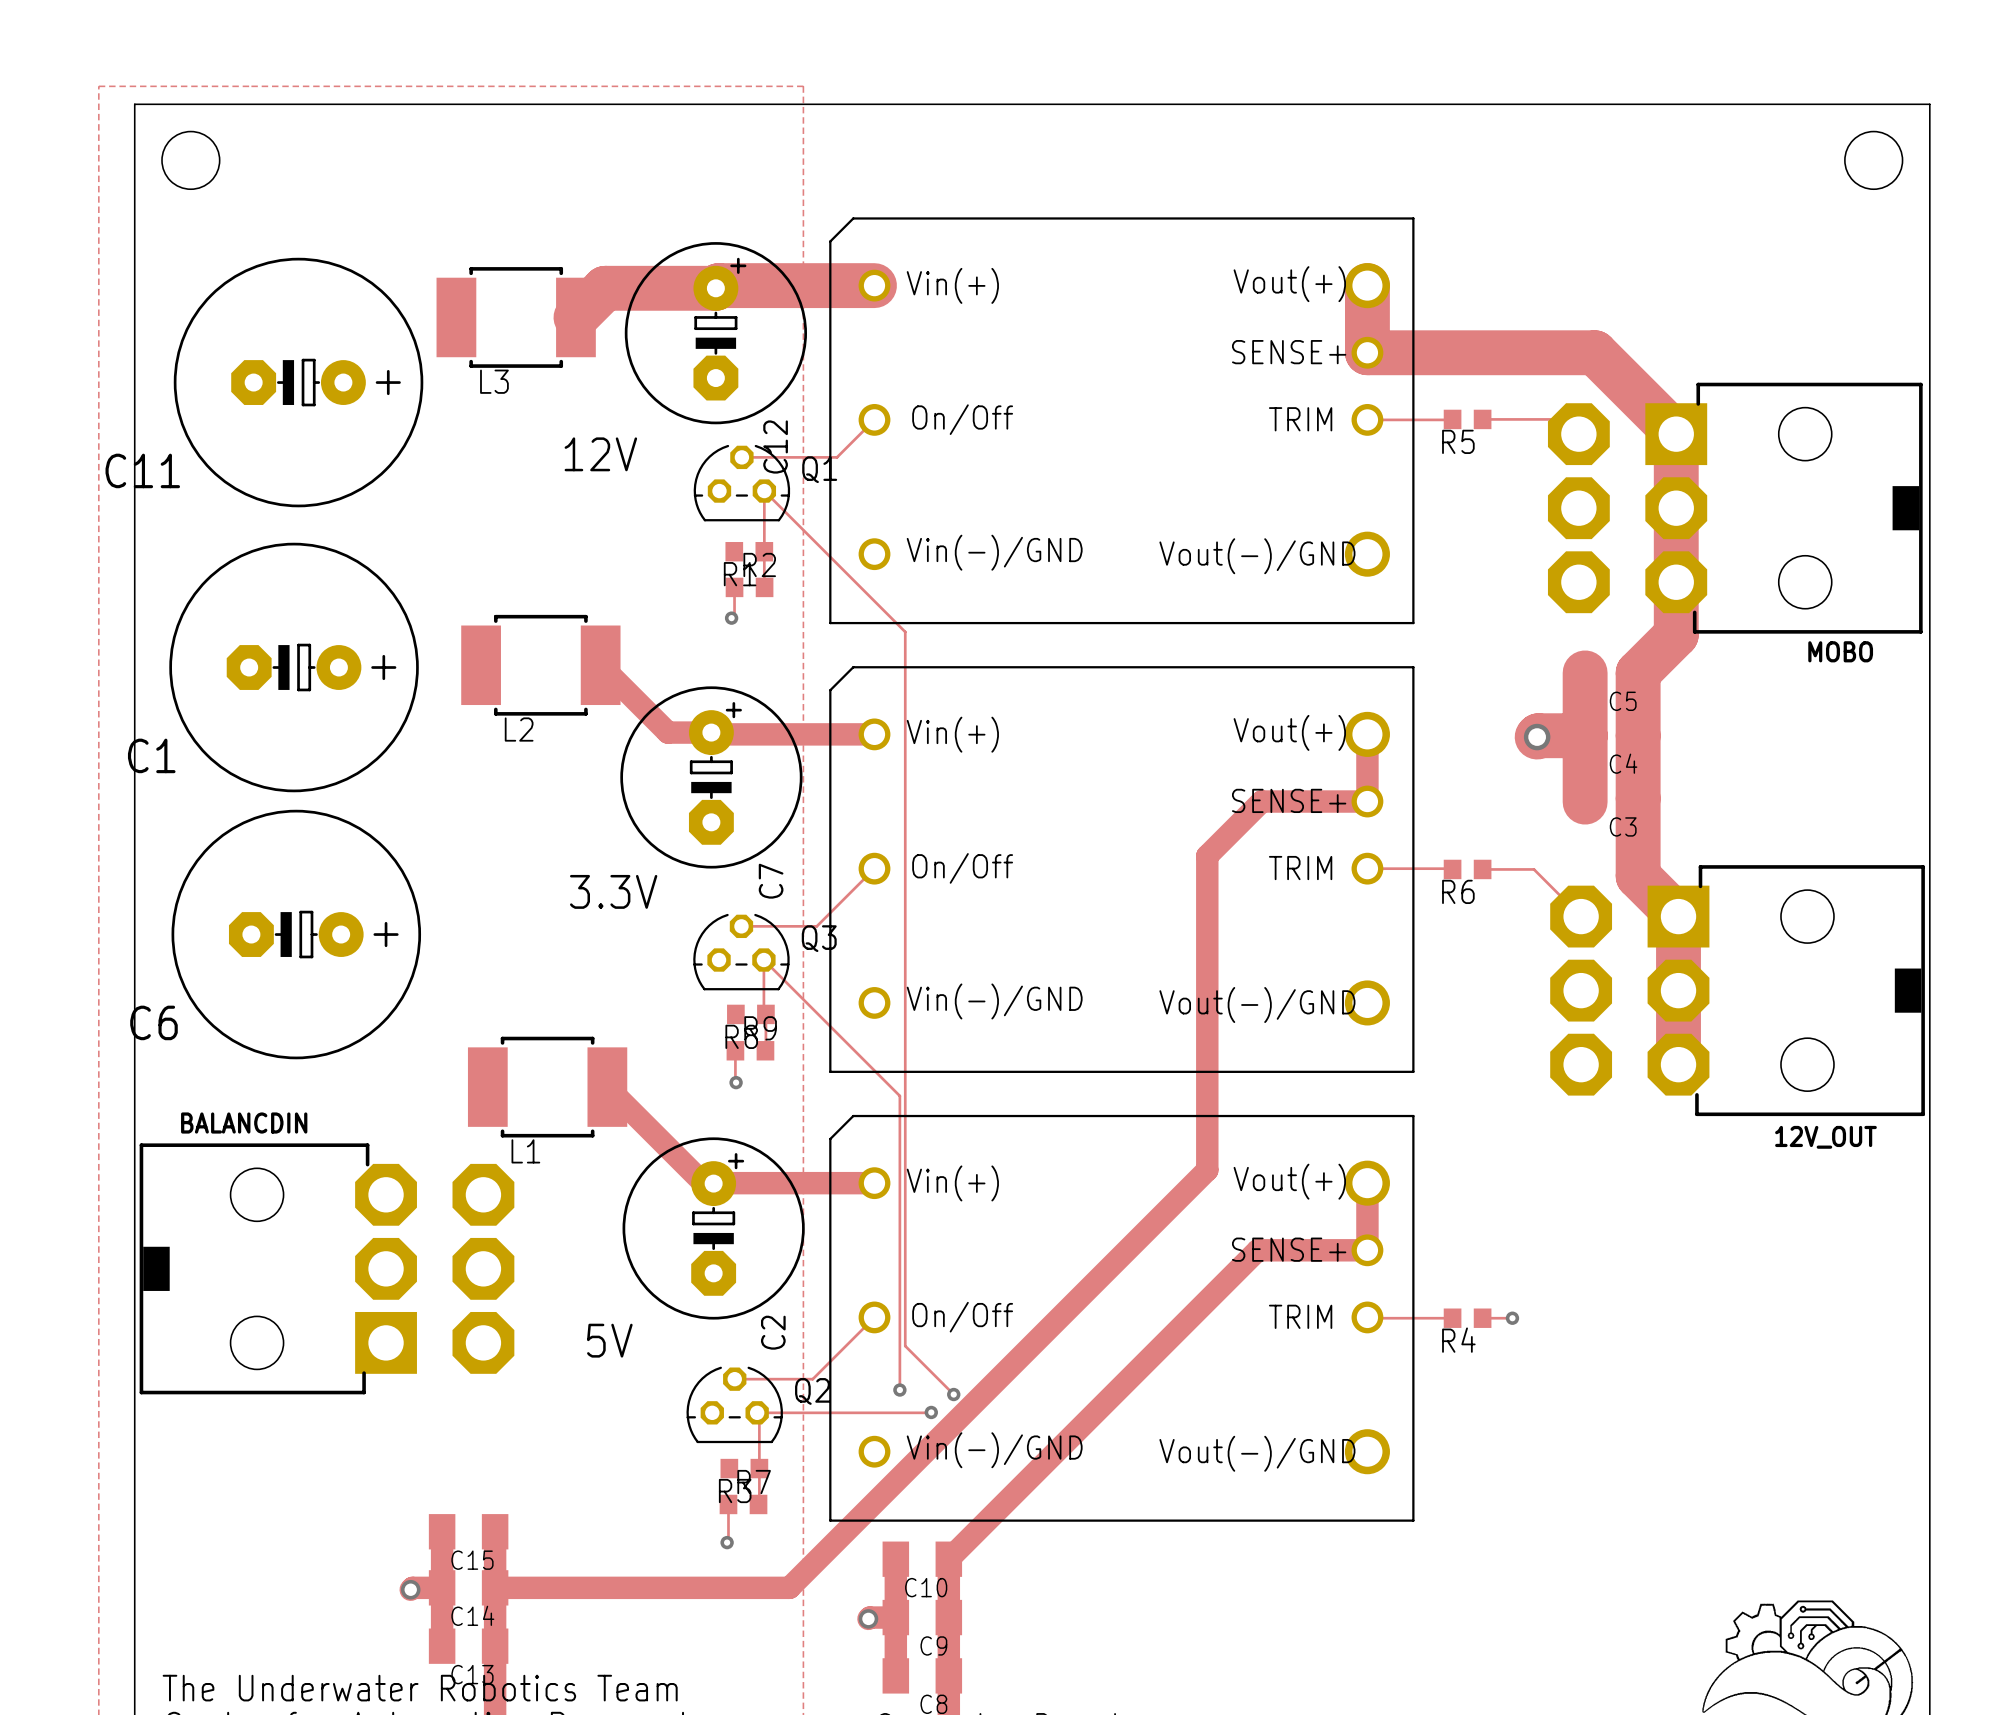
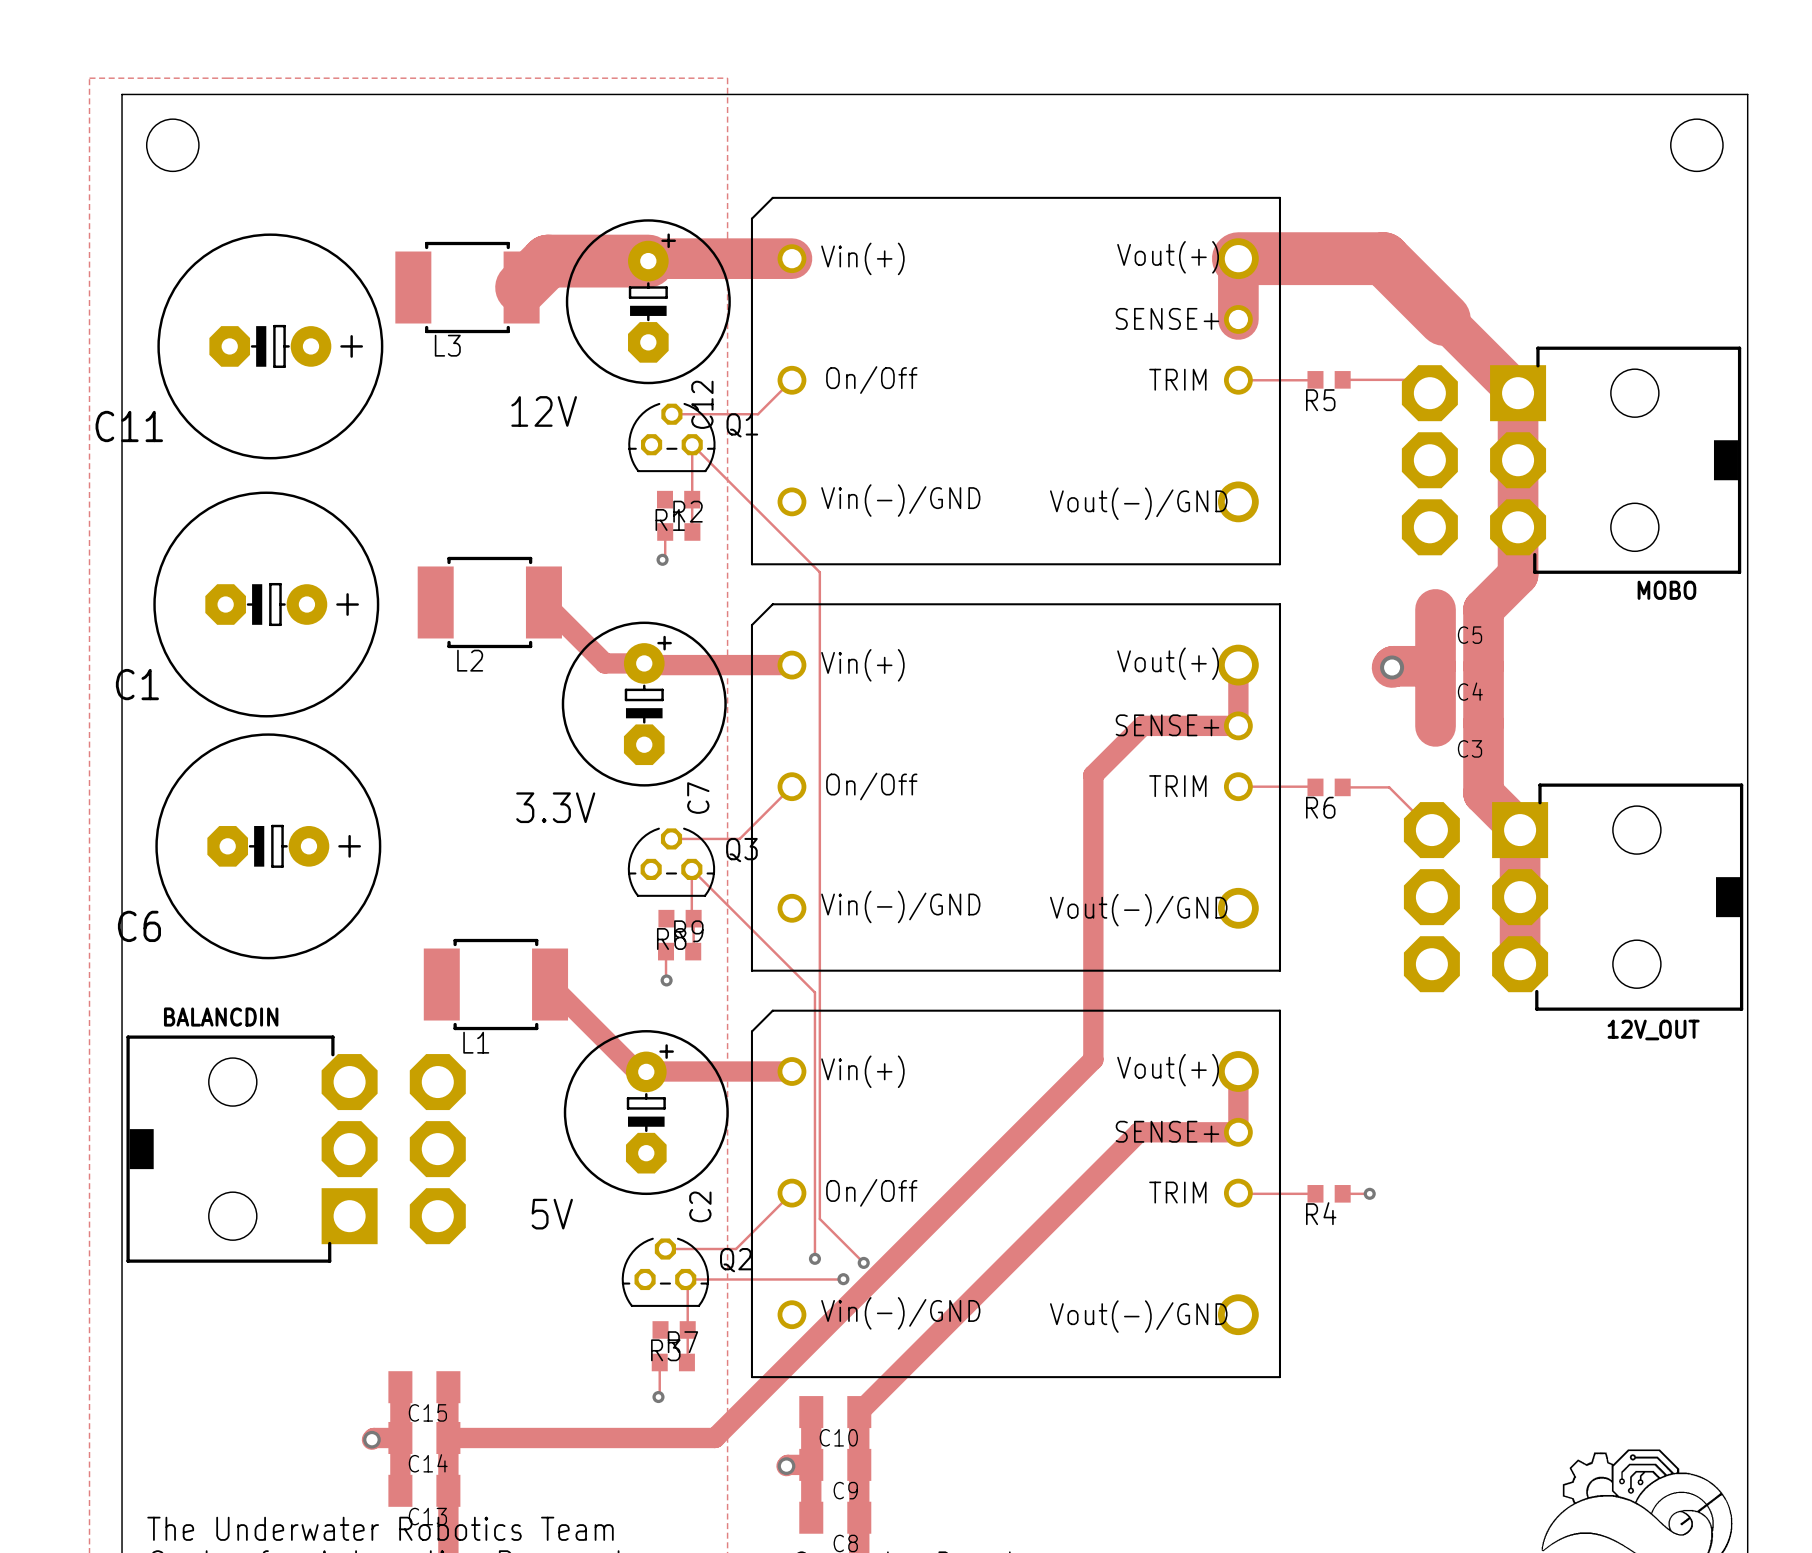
track width: thin (715, 288) (605, 288) (575, 317) -> thick (648, 261) (548, 261) (521, 287)
track: (1367, 352) (1594, 352) -> (1238, 258) (1383, 258) (1444, 319)

